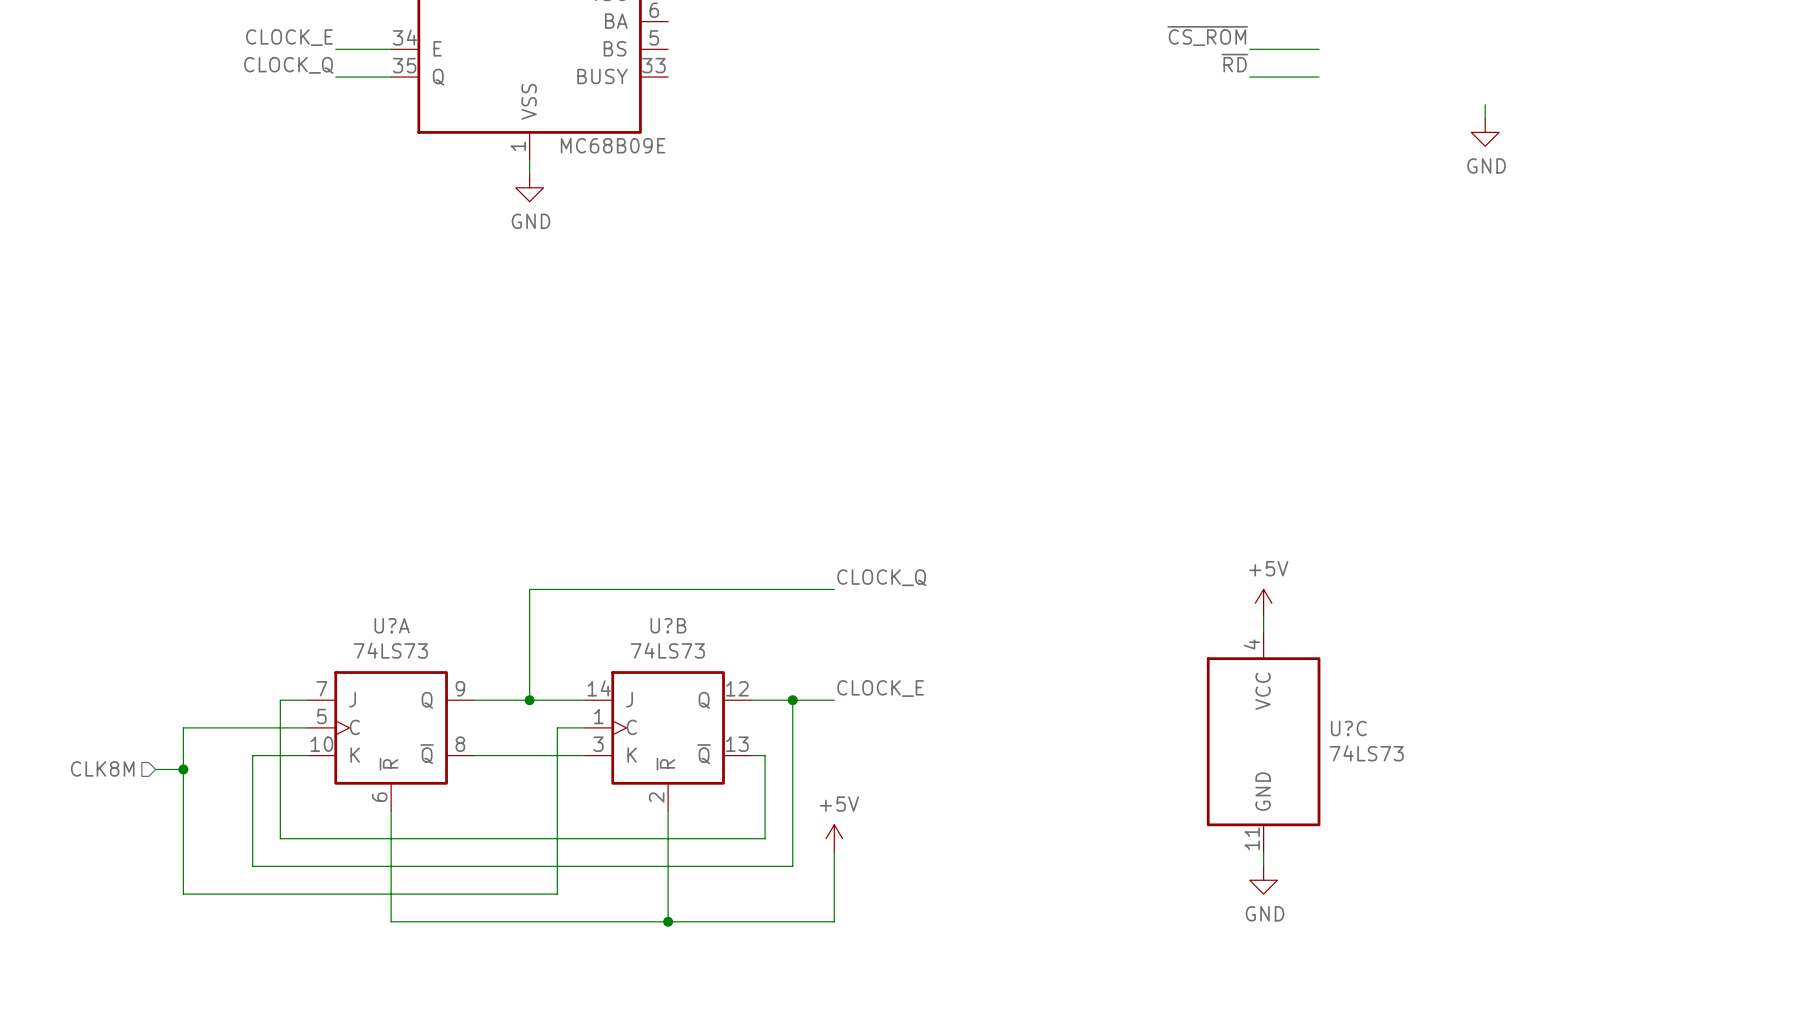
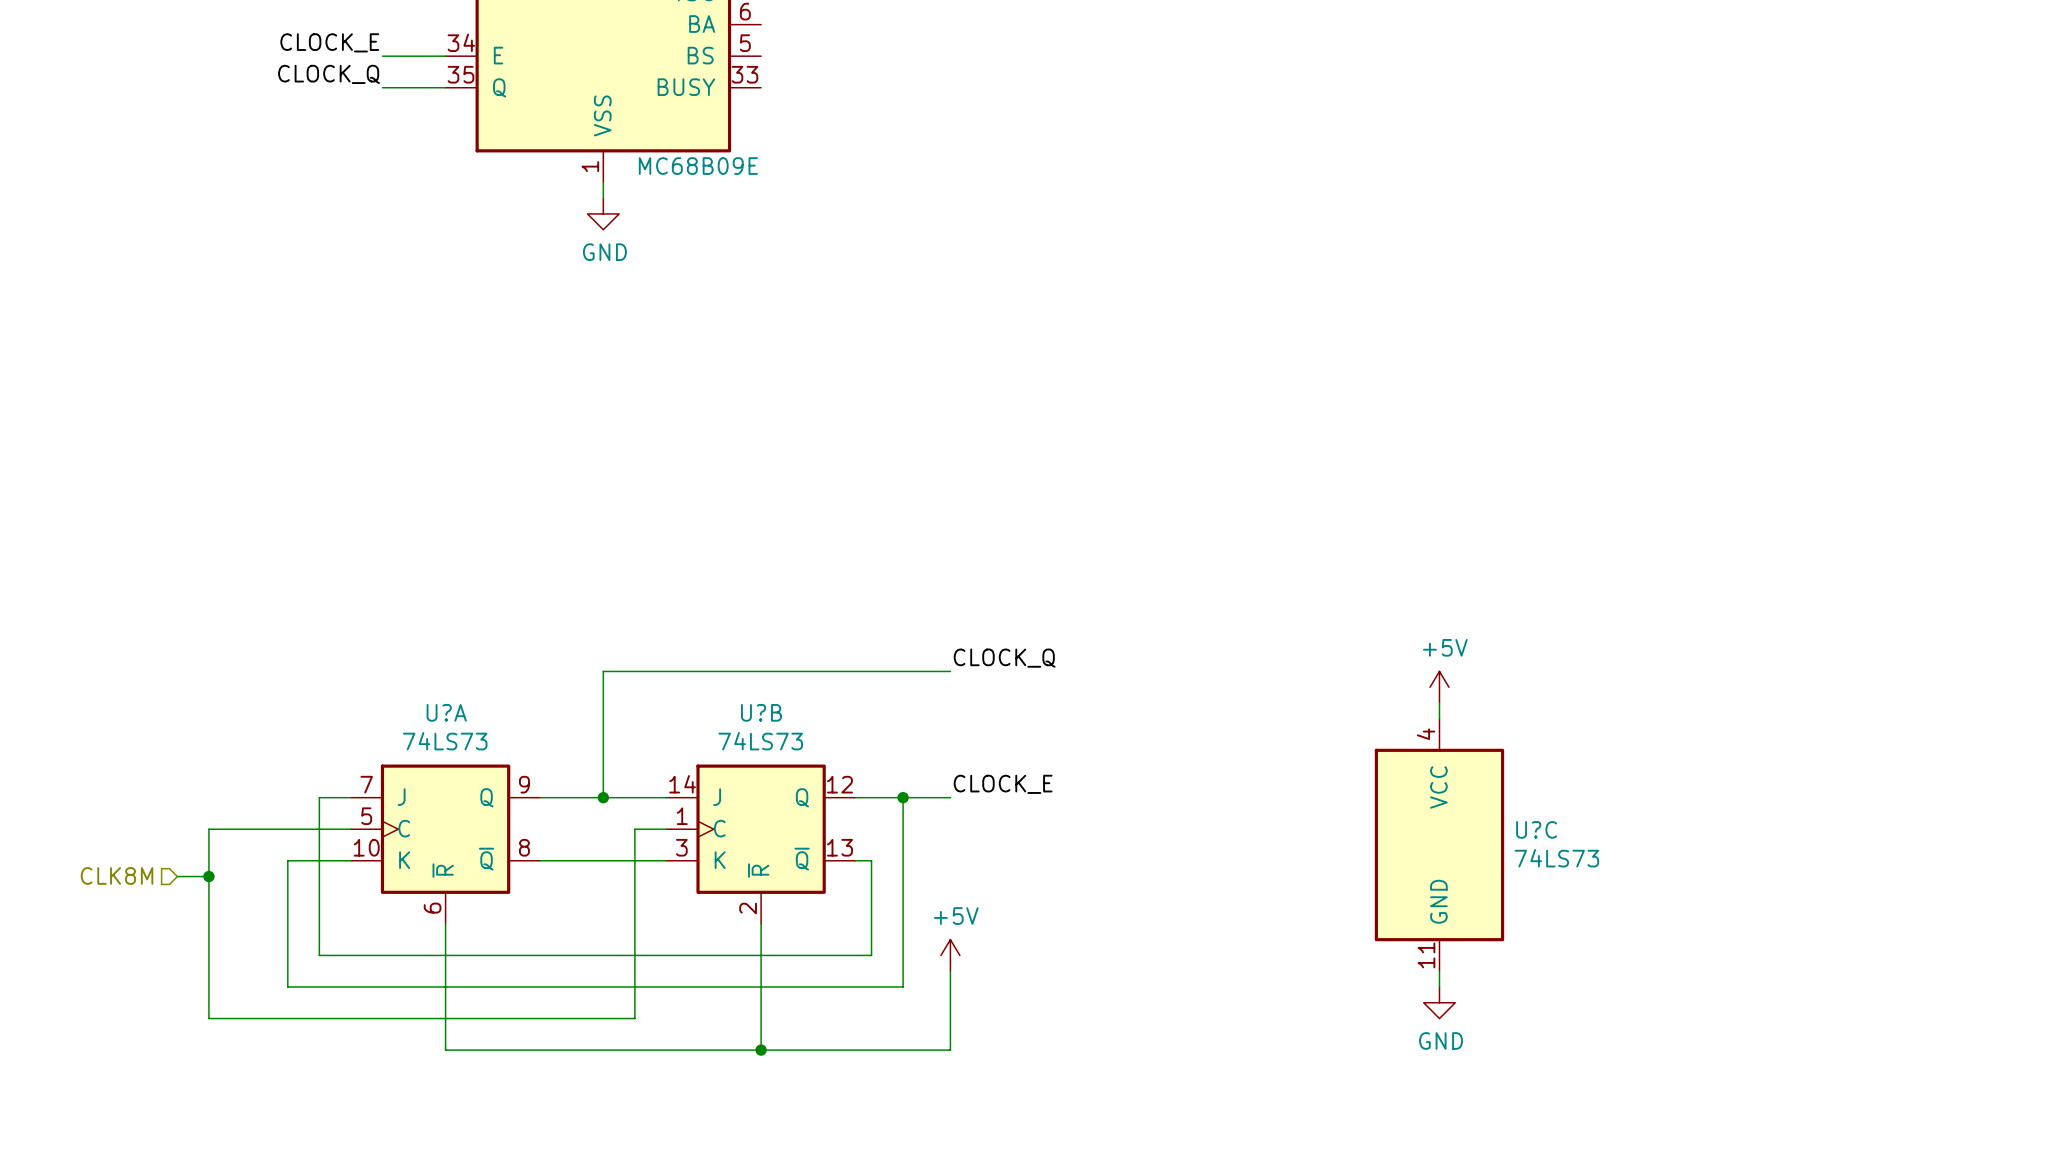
label: ~{CS_ROM} (1207, 36) -> none
wire: (1249, 49) (1319, 49) -> none
label: ~{RD} (1234, 63) -> none
wire: (1249, 77) (1319, 77) -> none
wire: (1485, 104) (1485, 118) -> none
power symbol: GND (1485, 132) -> none

